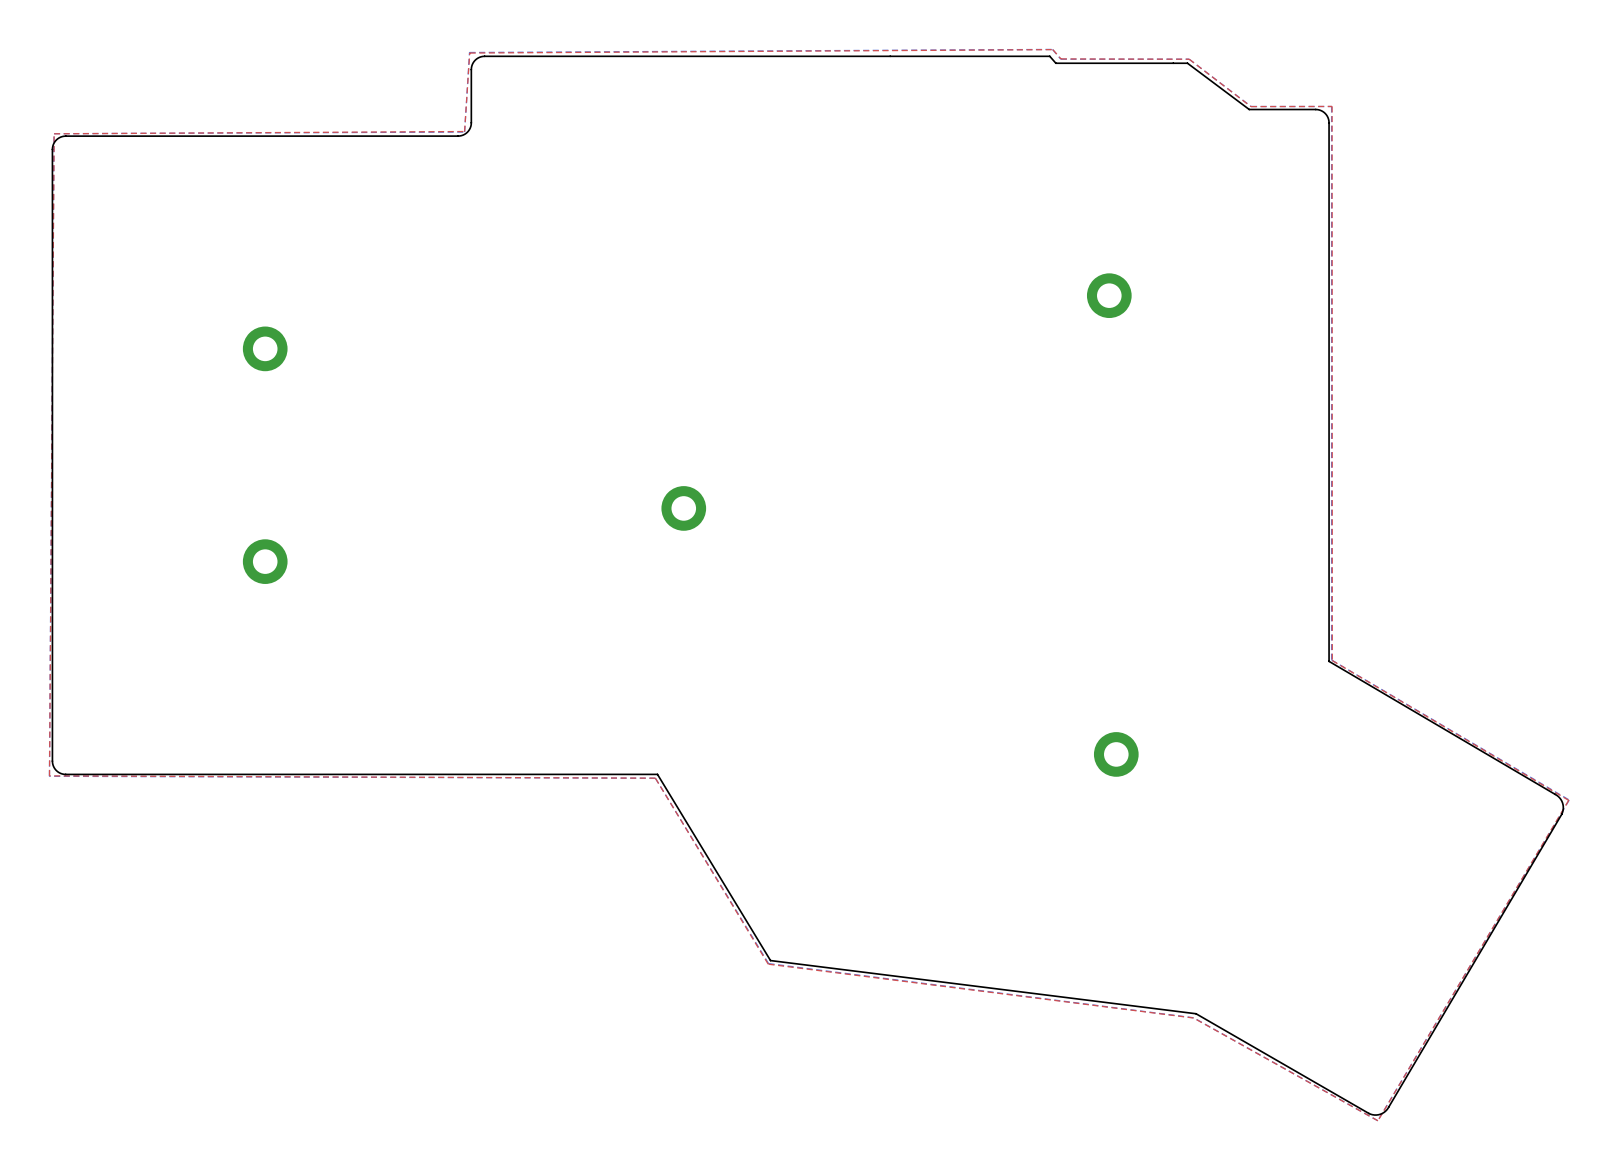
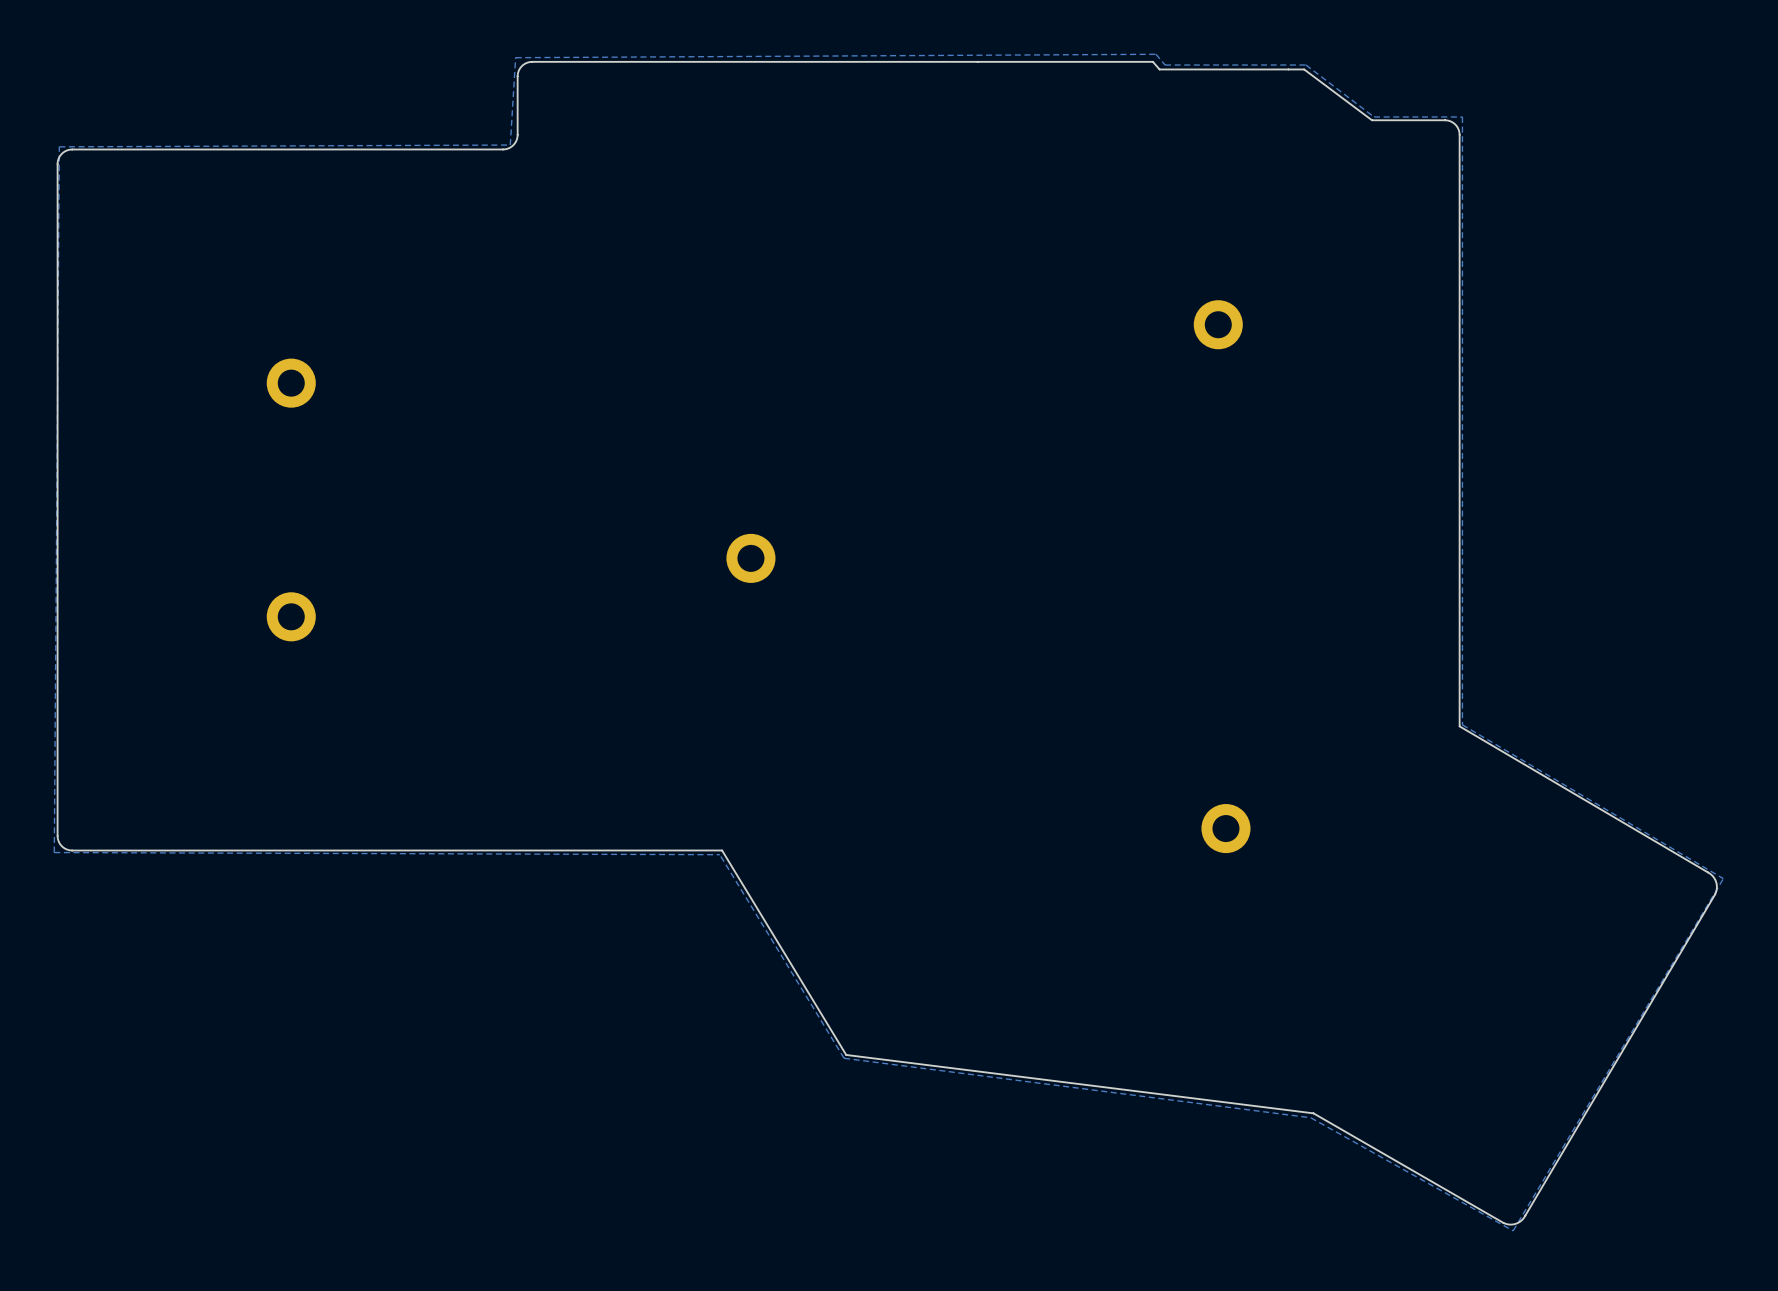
top zone outline: (1052, 49) (469, 53) (464, 131) (54, 133) (49, 775) (655, 778) (768, 964) (1193, 1018) (1377, 1120) (1568, 800) (1332, 660) (1332, 106) (1250, 106) (1189, 59) (1060, 58) (1052, 49) -> none

